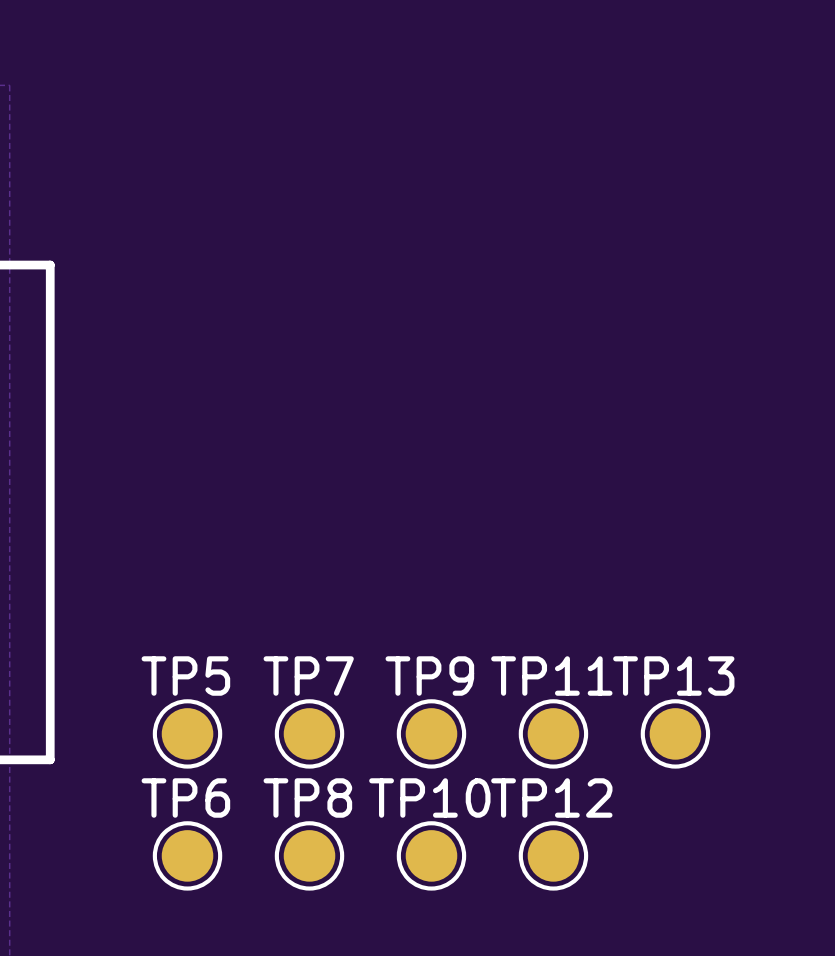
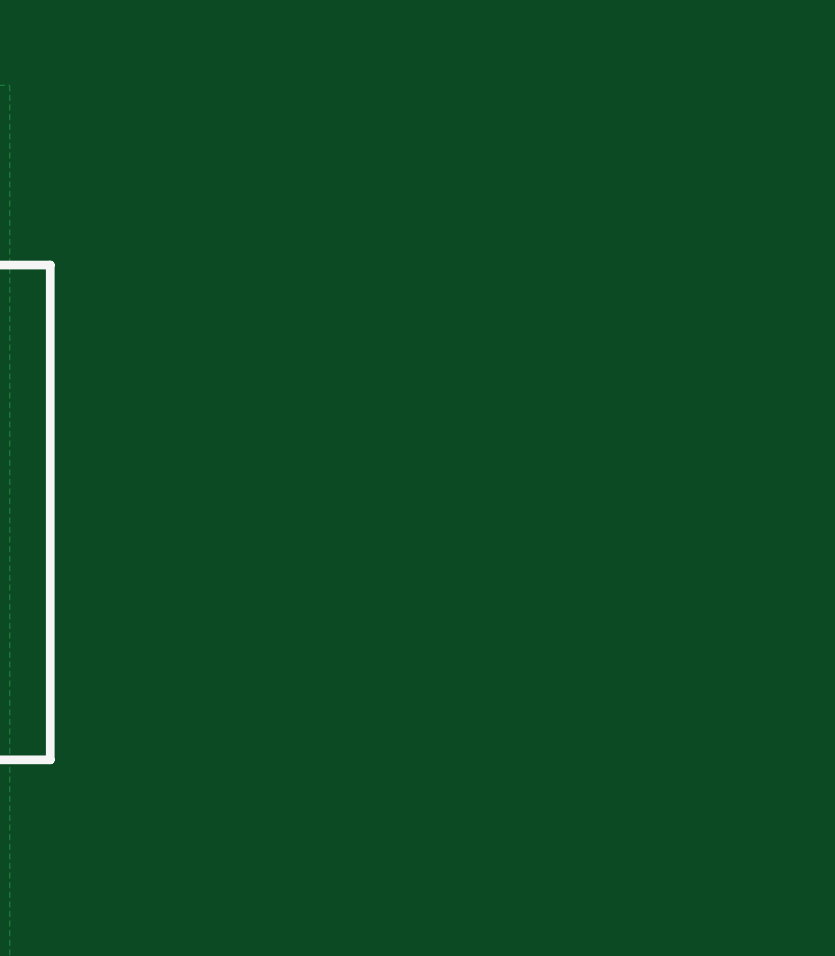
TP5: (187, 733) -> none
TP7: (309, 733) -> none
TP9: (431, 733) -> none
TP11: (553, 733) -> none
TP13: (675, 733) -> none
TP6: (187, 855) -> none
TP8: (309, 855) -> none
TP10: (431, 855) -> none
TP12: (553, 855) -> none

